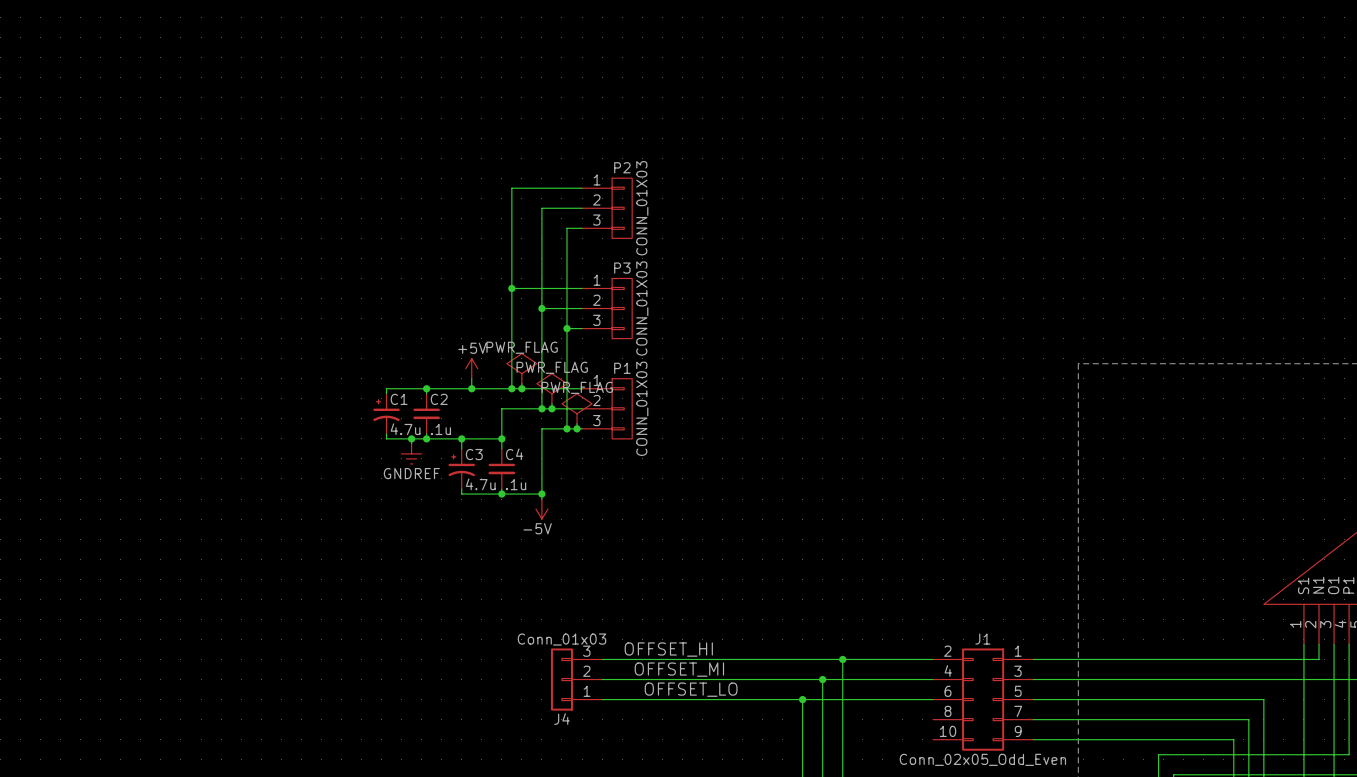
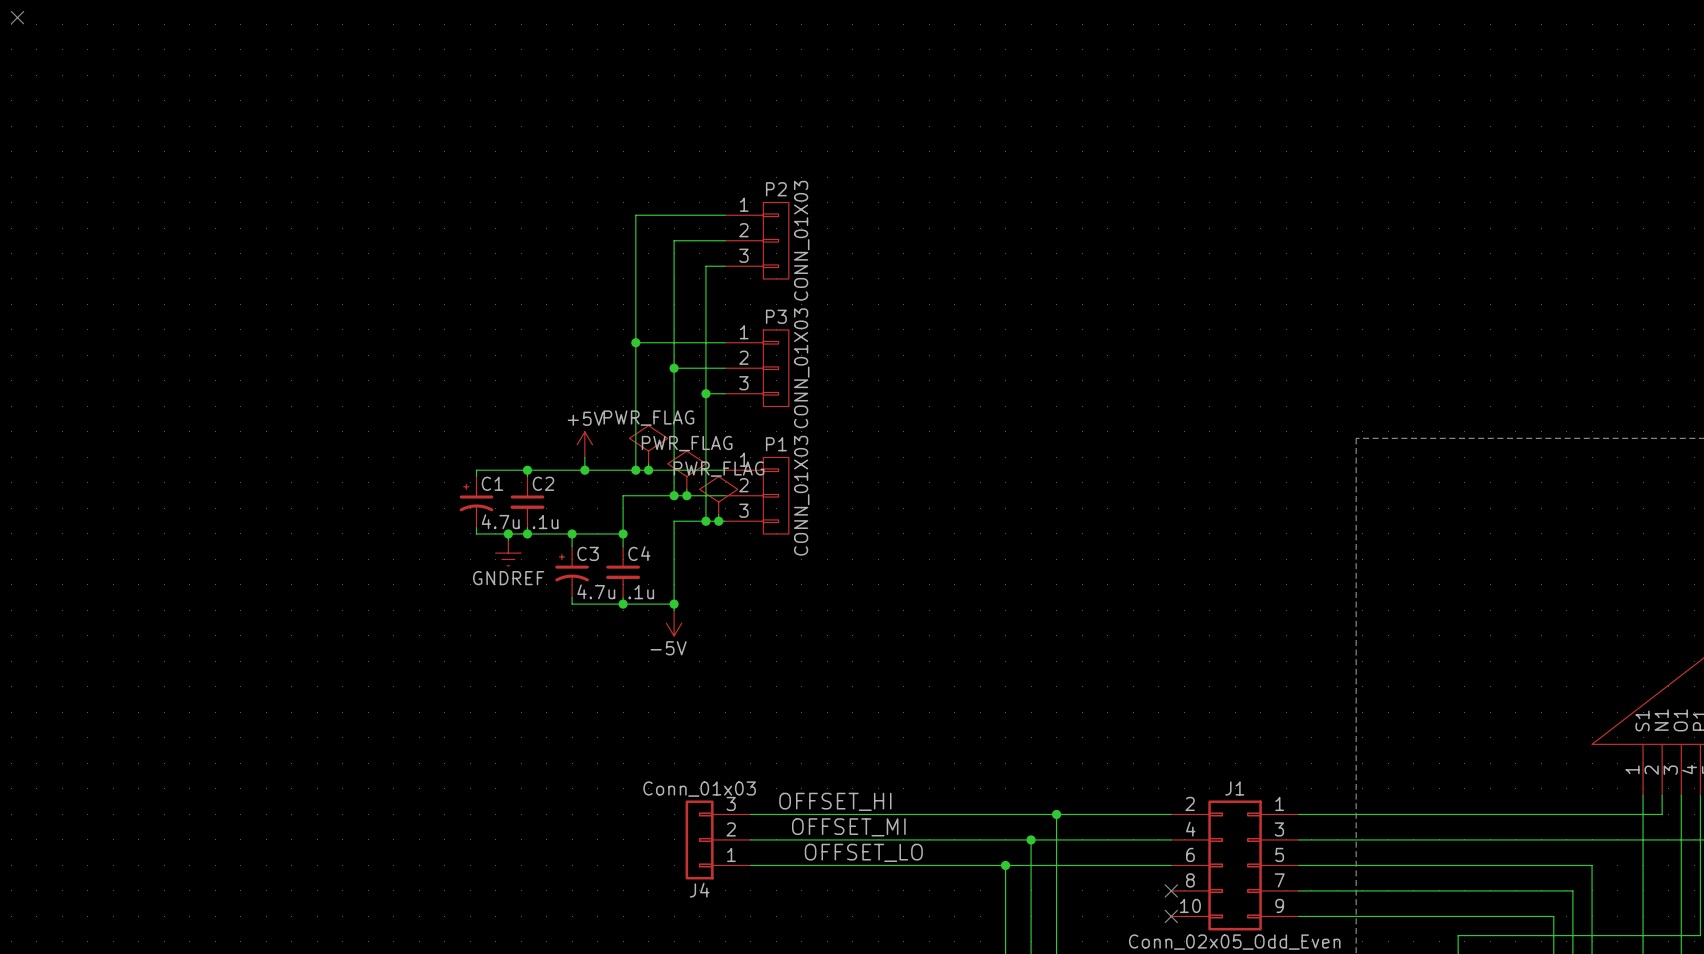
no-connect mark: none -> (17, 17)
no-connect mark: none -> (1171, 890)
no-connect mark: none -> (1171, 916)

